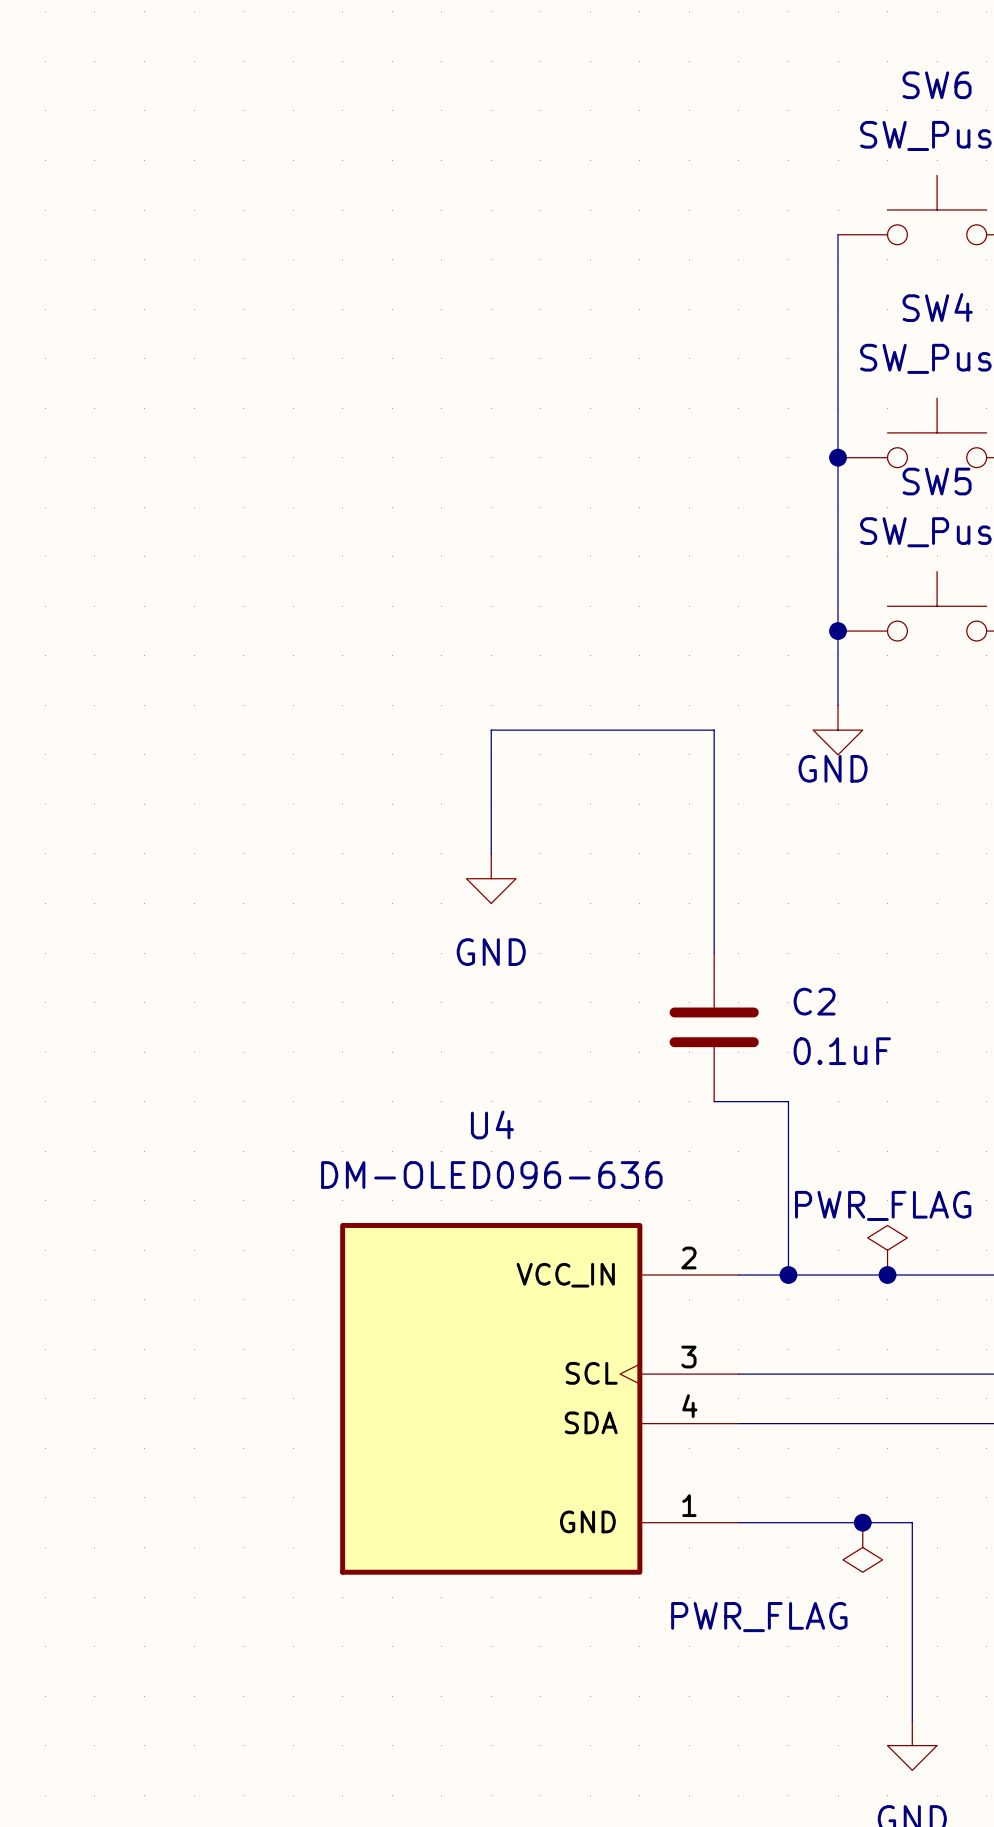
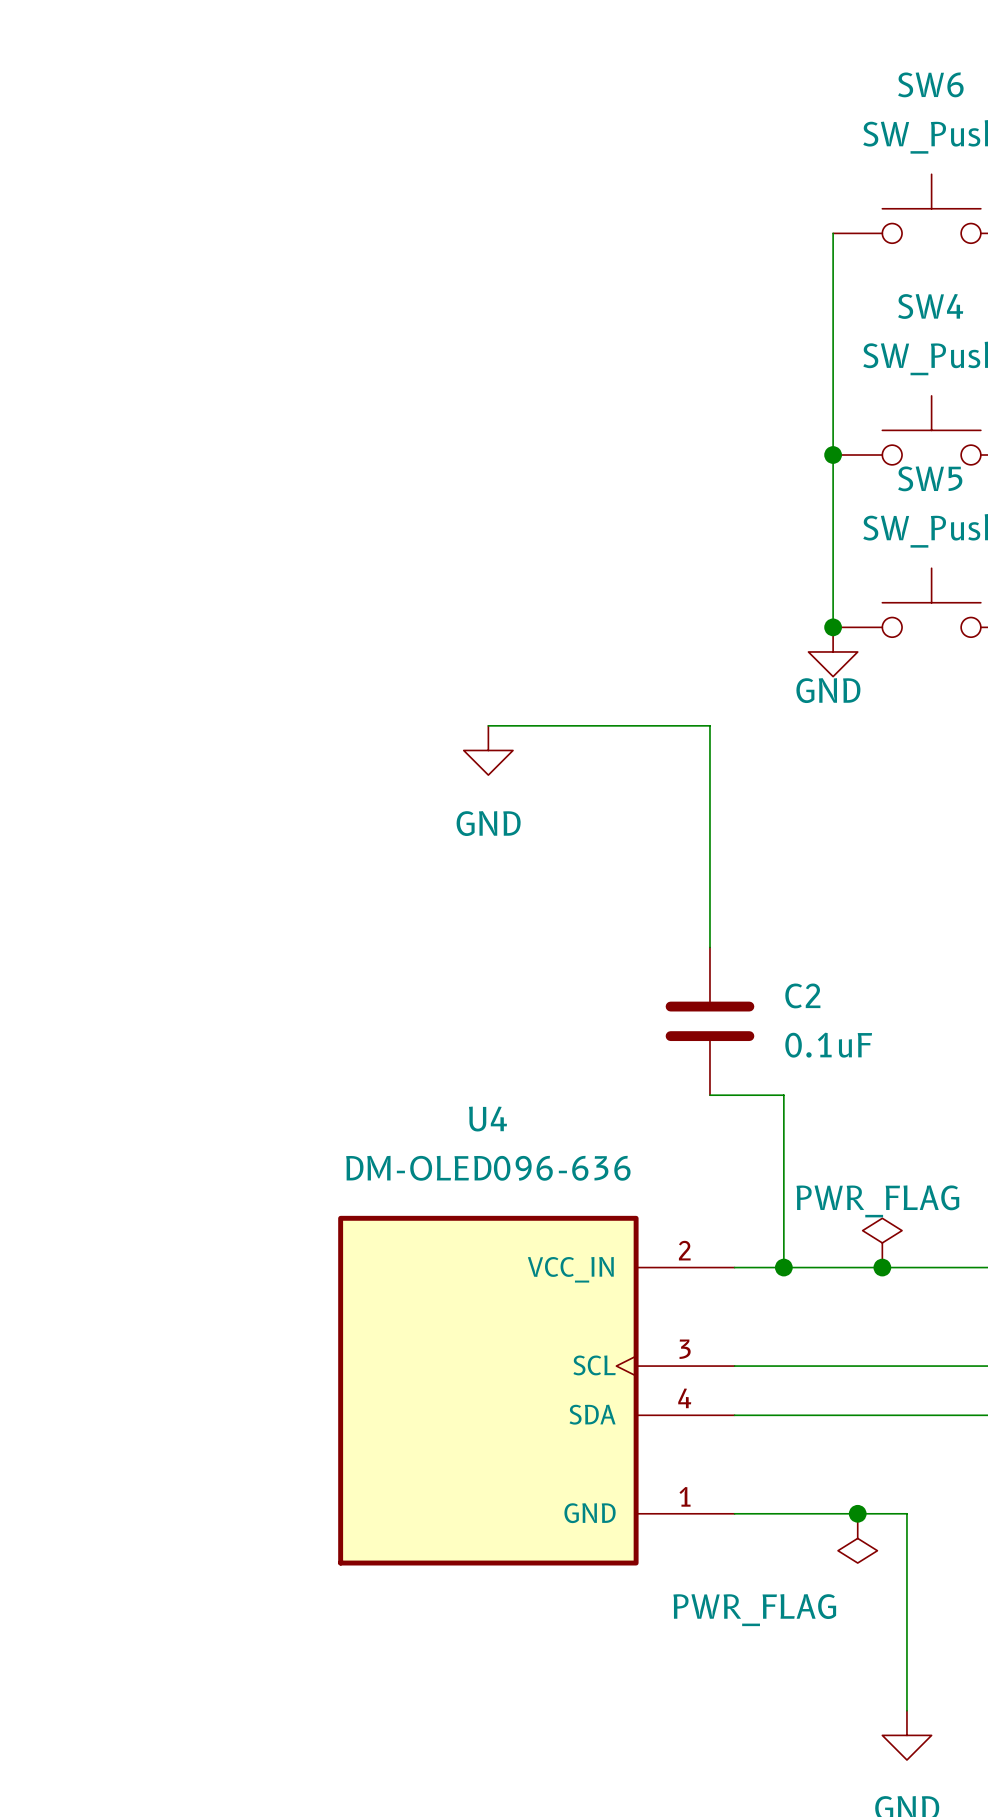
wire: (838, 631) (838, 705) -> none
wire: (491, 730) (491, 853) -> none
power symbol position: GND (838, 730) -> GND (833, 651)
power symbol position: GND (491, 878) -> GND (488, 750)

